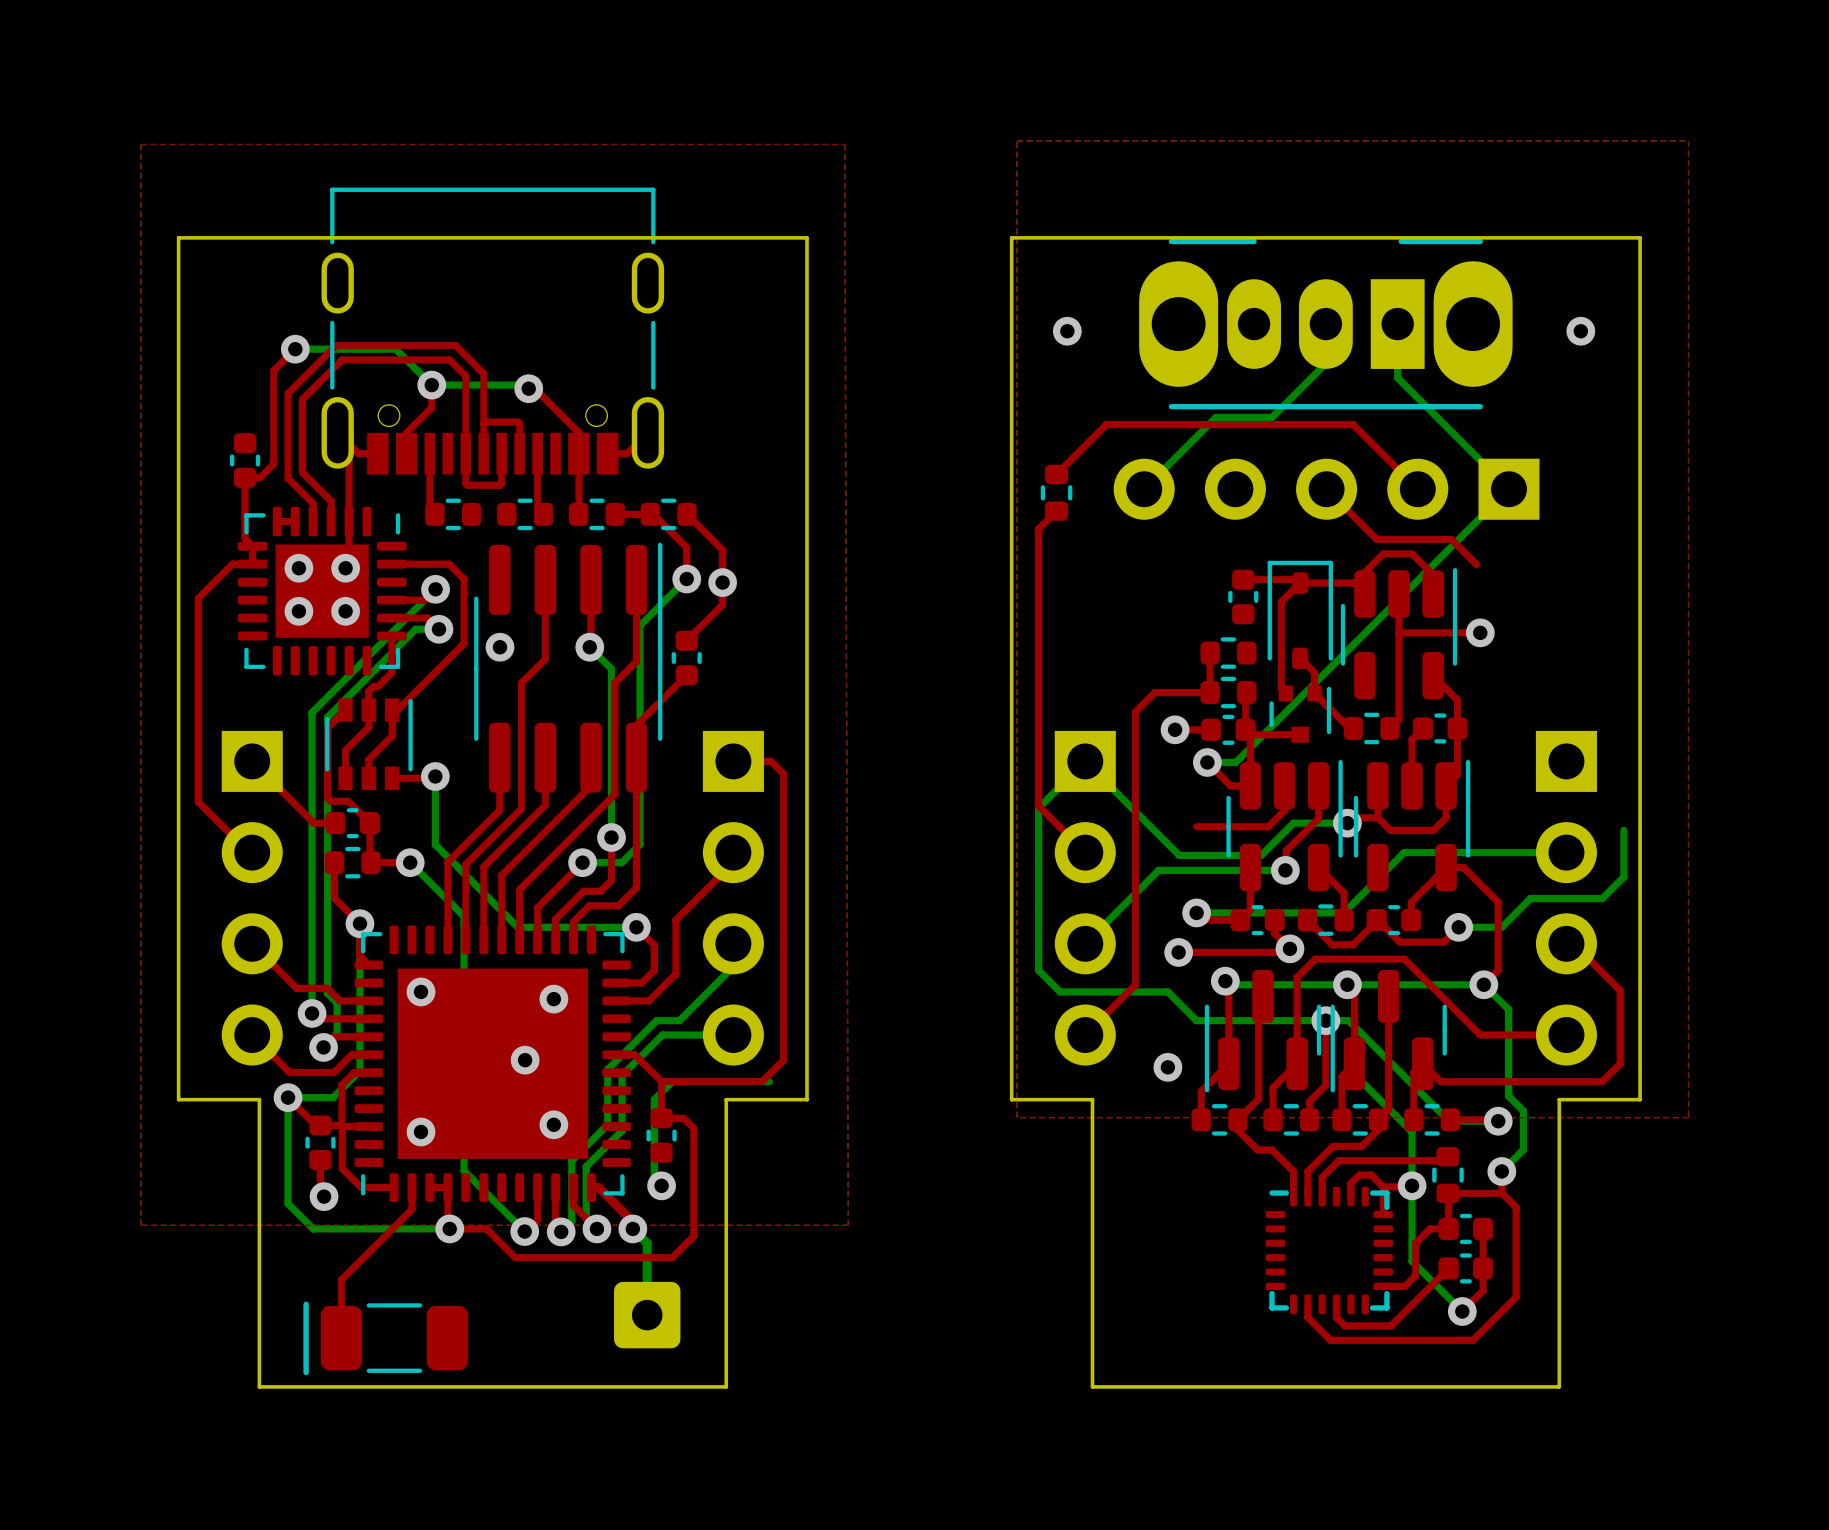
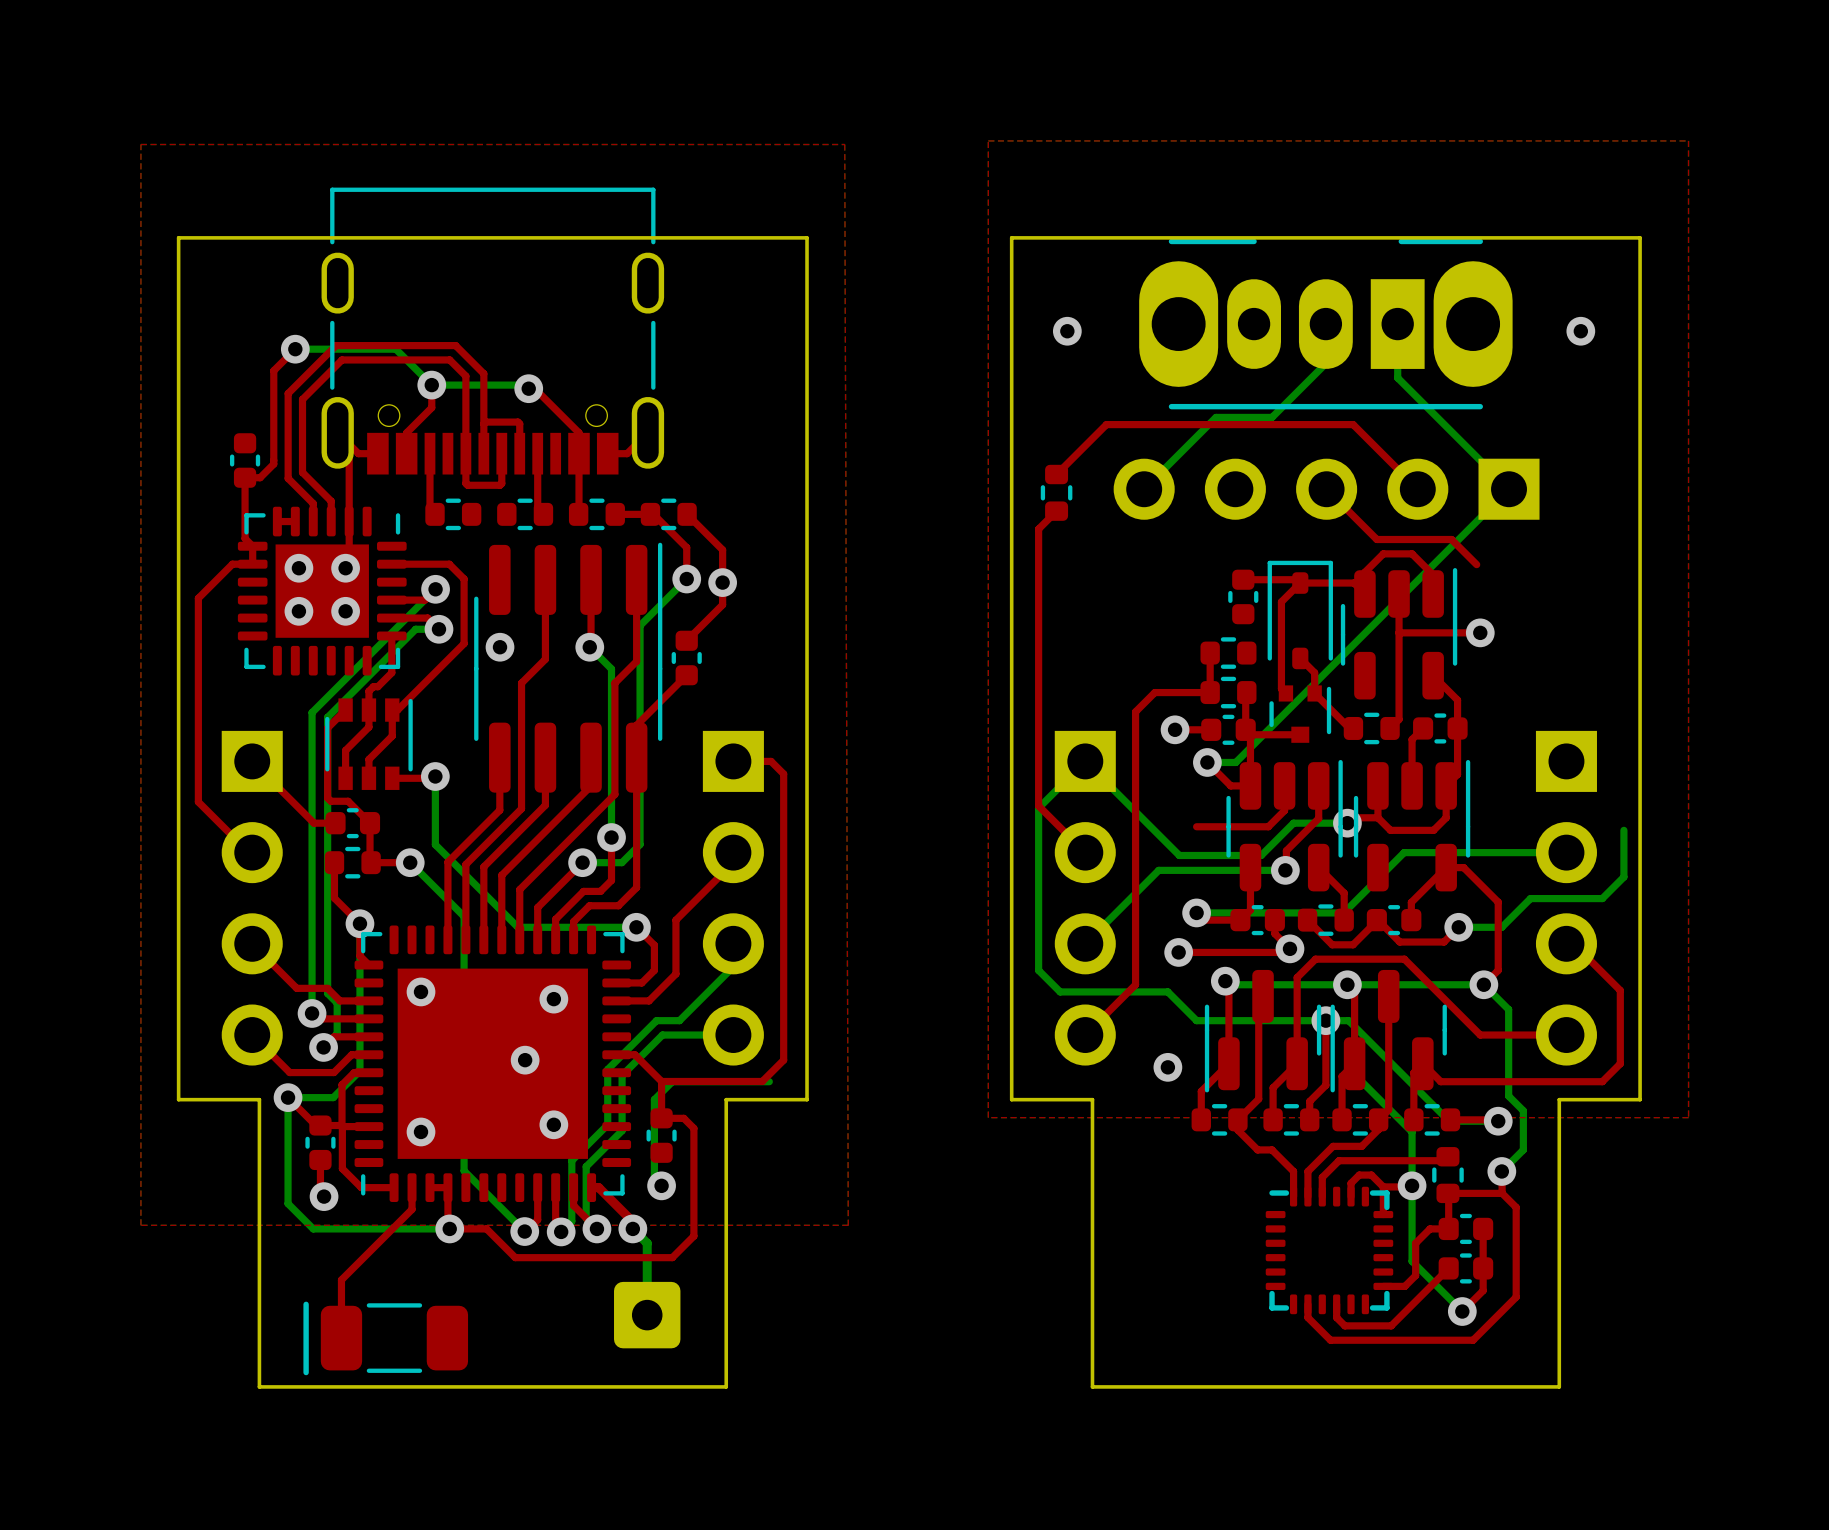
top zone outline: (1017, 140) (1017, 1117) -> (1017, 140) (988, 140) (988, 1117) (1017, 1117)

